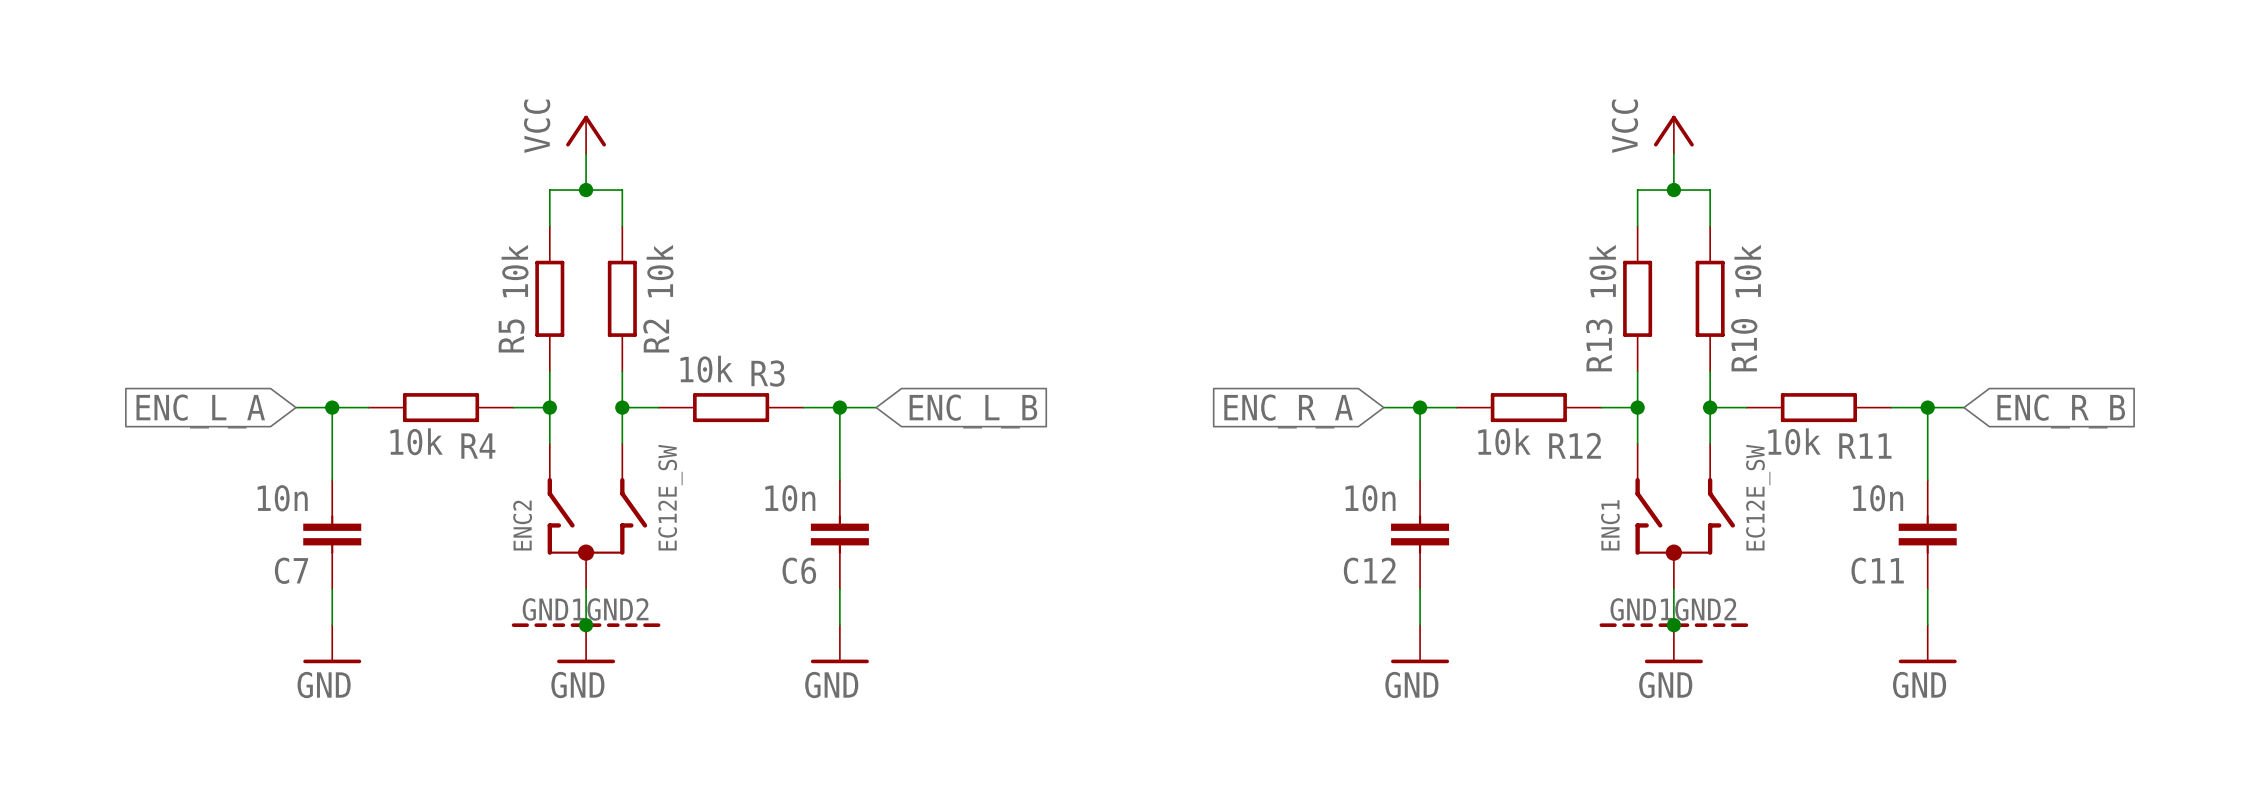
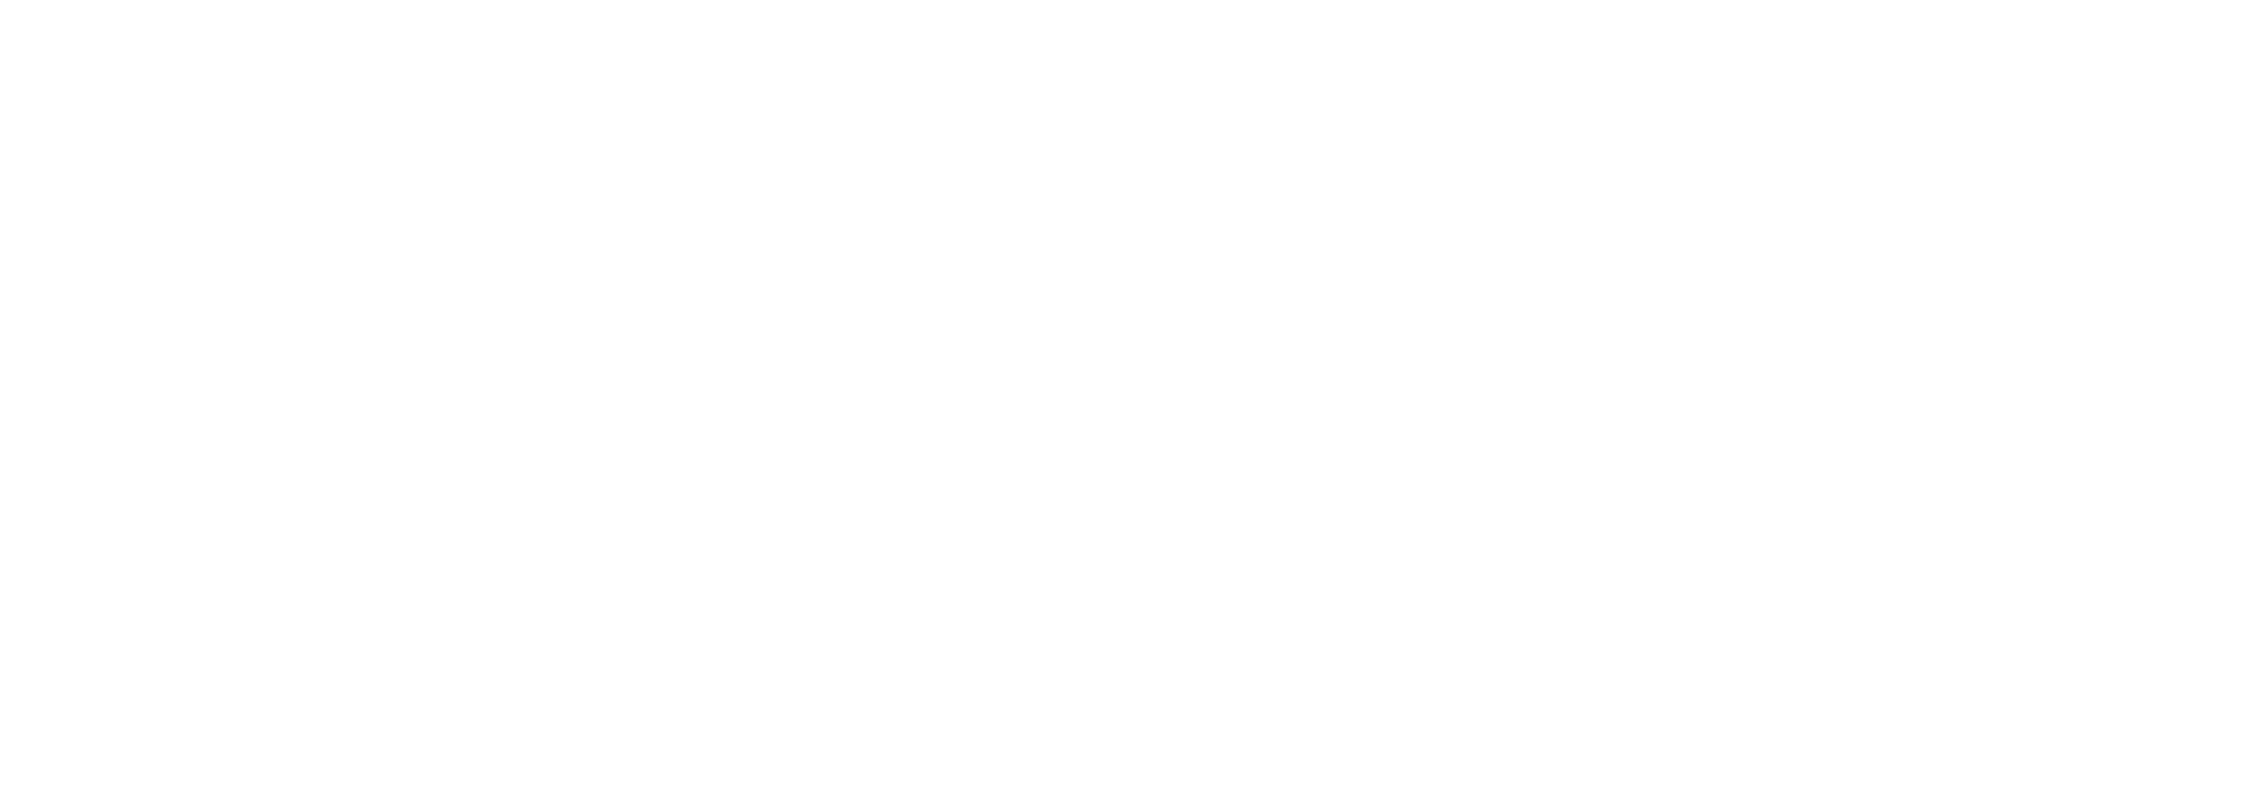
power symbol: VCC (586, 134) -> none
power symbol: VCC (1673, 134) -> none
wire: (586, 153) (586, 190) -> none
wire: (1673, 153) (1673, 190) -> none
junction: (586, 190) -> none
junction: (1673, 190) -> none
wire: (549, 226) (549, 190) (622, 190) (622, 226) -> none
wire: (1637, 226) (1637, 190) (1710, 190) (1710, 226) -> none
R5: 10k (549, 298) -> none
R2: 10k (622, 298) -> none
R13: 10k (1637, 298) -> none
R10: 10k (1710, 298) -> none
wire: (549, 371) (549, 443) -> none
wire: (622, 371) (622, 443) -> none
wire: (1637, 371) (1637, 443) -> none
wire: (1710, 371) (1710, 443) -> none
wire: (295, 407) (368, 407) -> none
wire: (332, 407) (332, 480) -> none
junction: (332, 407) -> none
R4: 10k (441, 407) -> none
wire: (513, 407) (549, 407) -> none
junction: (549, 407) -> none
wire: (622, 407) (658, 407) -> none
junction: (622, 407) -> none
R3: 10k (731, 407) -> none
wire: (803, 407) (876, 407) -> none
wire: (839, 407) (839, 480) -> none
junction: (839, 407) -> none
wire: (1383, 407) (1456, 407) -> none
wire: (1420, 407) (1420, 480) -> none
junction: (1420, 407) -> none
R12: 10k (1528, 407) -> none
wire: (1601, 407) (1637, 407) -> none
junction: (1637, 407) -> none
wire: (1710, 407) (1746, 407) -> none
junction: (1710, 407) -> none
R11: 10k (1818, 407) -> none
wire: (1891, 407) (1963, 407) -> none
wire: (1927, 407) (1927, 480) -> none
junction: (1927, 407) -> none
global label: ENC_L_A (200, 411) -> none
global label: ENC_L_B (973, 411) -> none
global label: ENC_R_A (1288, 411) -> none
global label: ENC_R_B (2061, 411) -> none
ENC2: EC12E_SW (597, 516) -> none
ENC1: EC12E_SW (1685, 516) -> none
C7: 10n (332, 534) -> none
C6: 10n (839, 534) -> none
C12: 10n (1420, 534) -> none
C11: 10n (1927, 534) -> none
wire: (332, 588) (332, 625) -> none
wire: (586, 588) (586, 625) -> none
wire: (839, 588) (839, 625) -> none
wire: (1420, 588) (1420, 625) -> none
wire: (1673, 588) (1673, 625) -> none
wire: (1927, 588) (1927, 625) -> none
part: (549, 625) -> none
junction: (586, 625) -> none
part: (622, 625) -> none
part: (1637, 625) -> none
junction: (1673, 625) -> none
part: (1710, 625) -> none
power symbol: GND (332, 644) -> none
power symbol: GND (586, 644) -> none
power symbol: GND (839, 644) -> none
power symbol: GND (1420, 644) -> none
power symbol: GND (1673, 644) -> none
power symbol: GND (1927, 644) -> none

